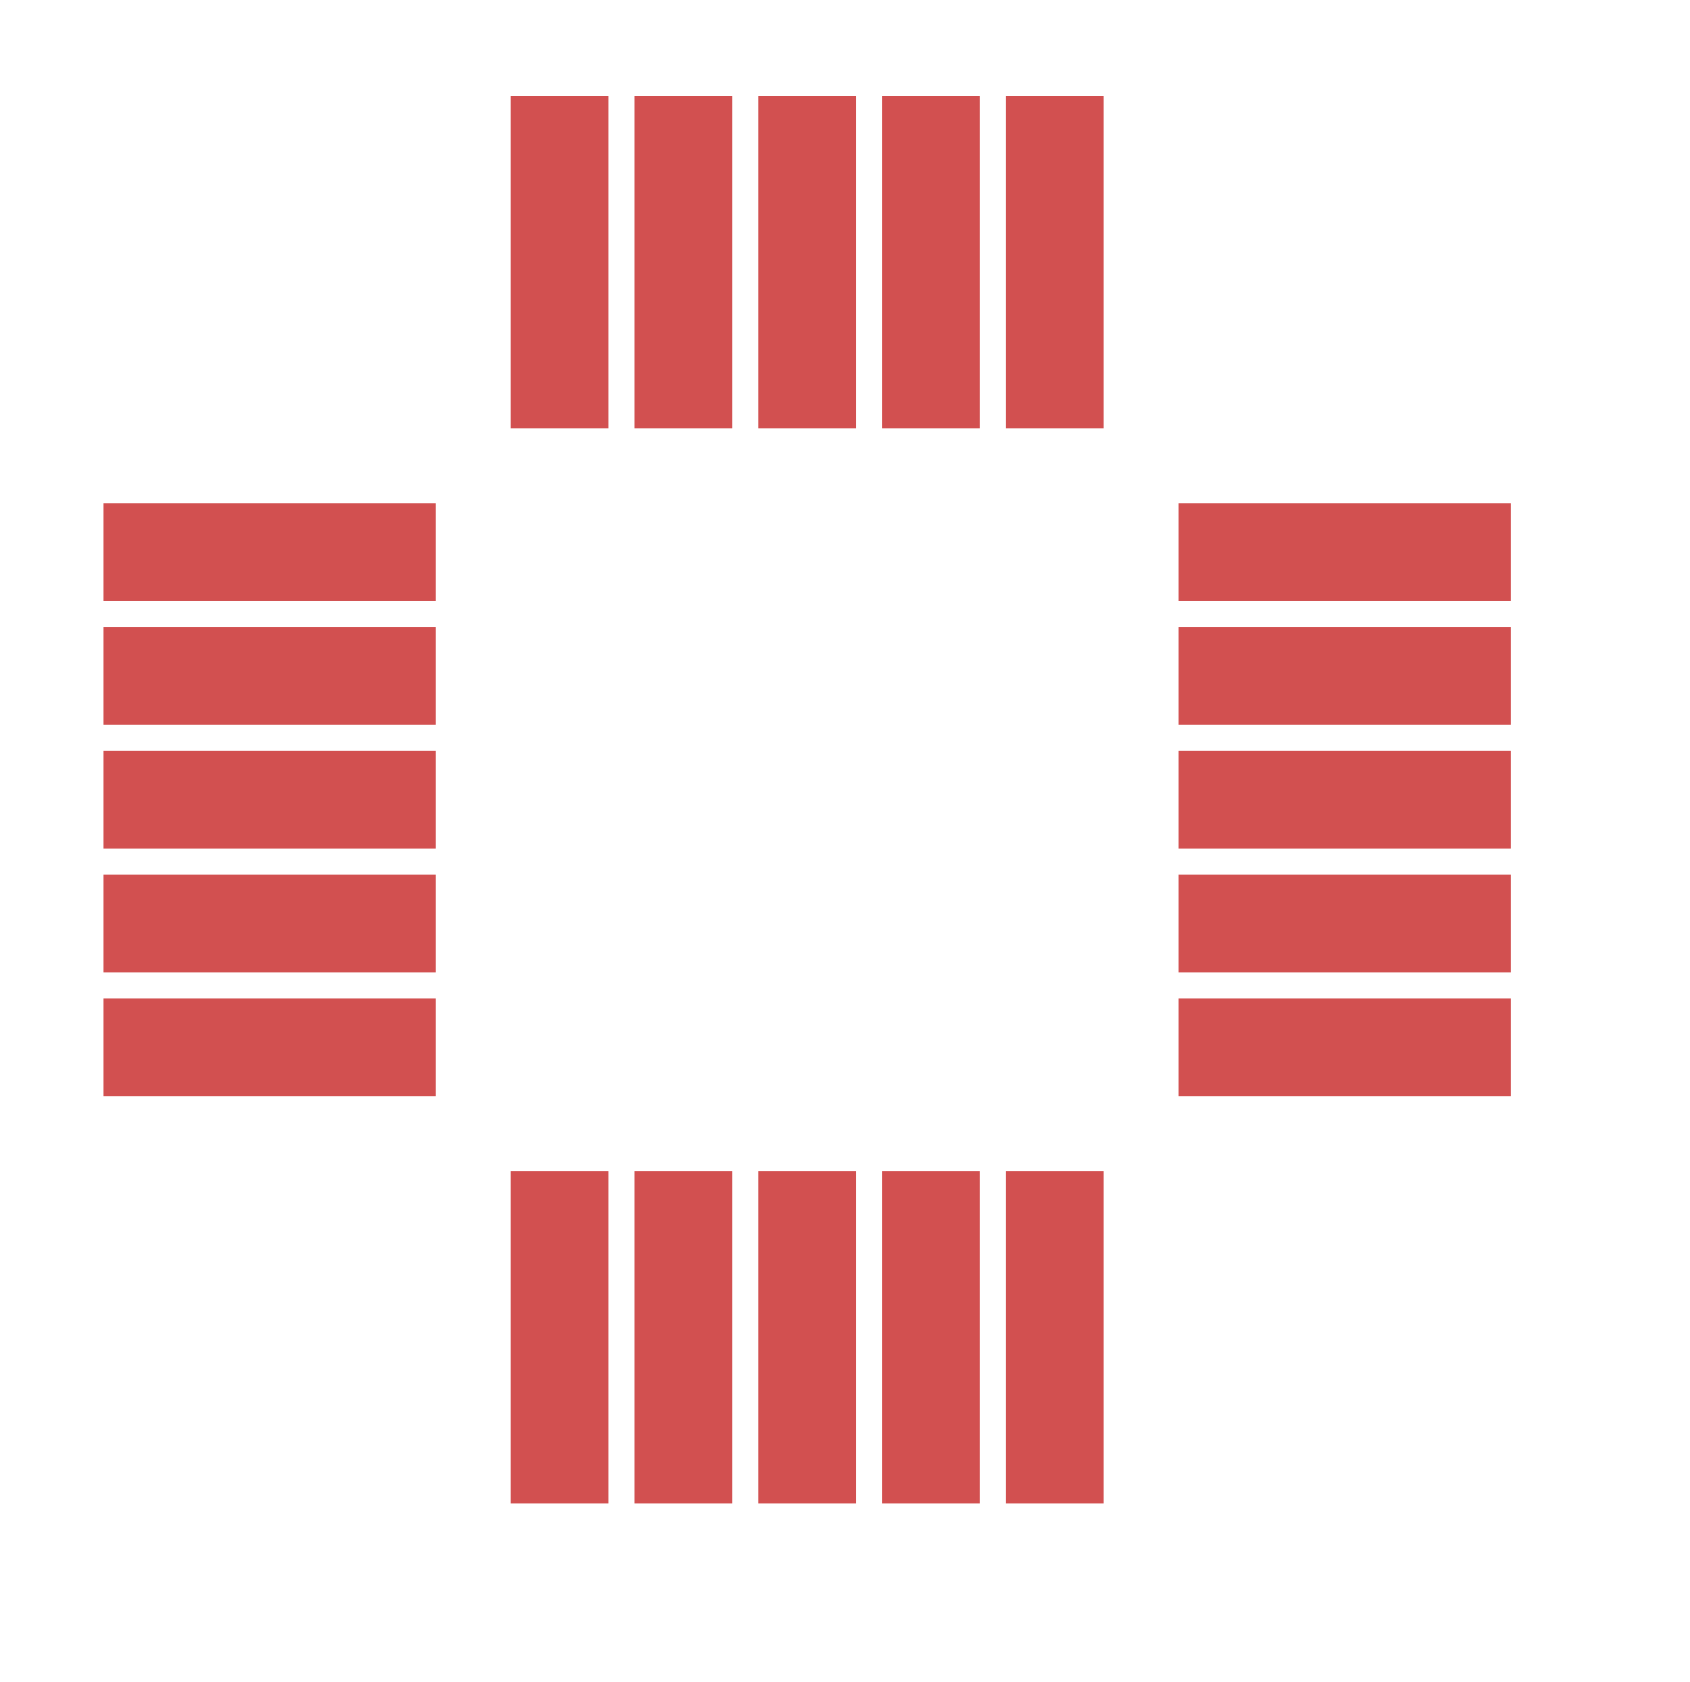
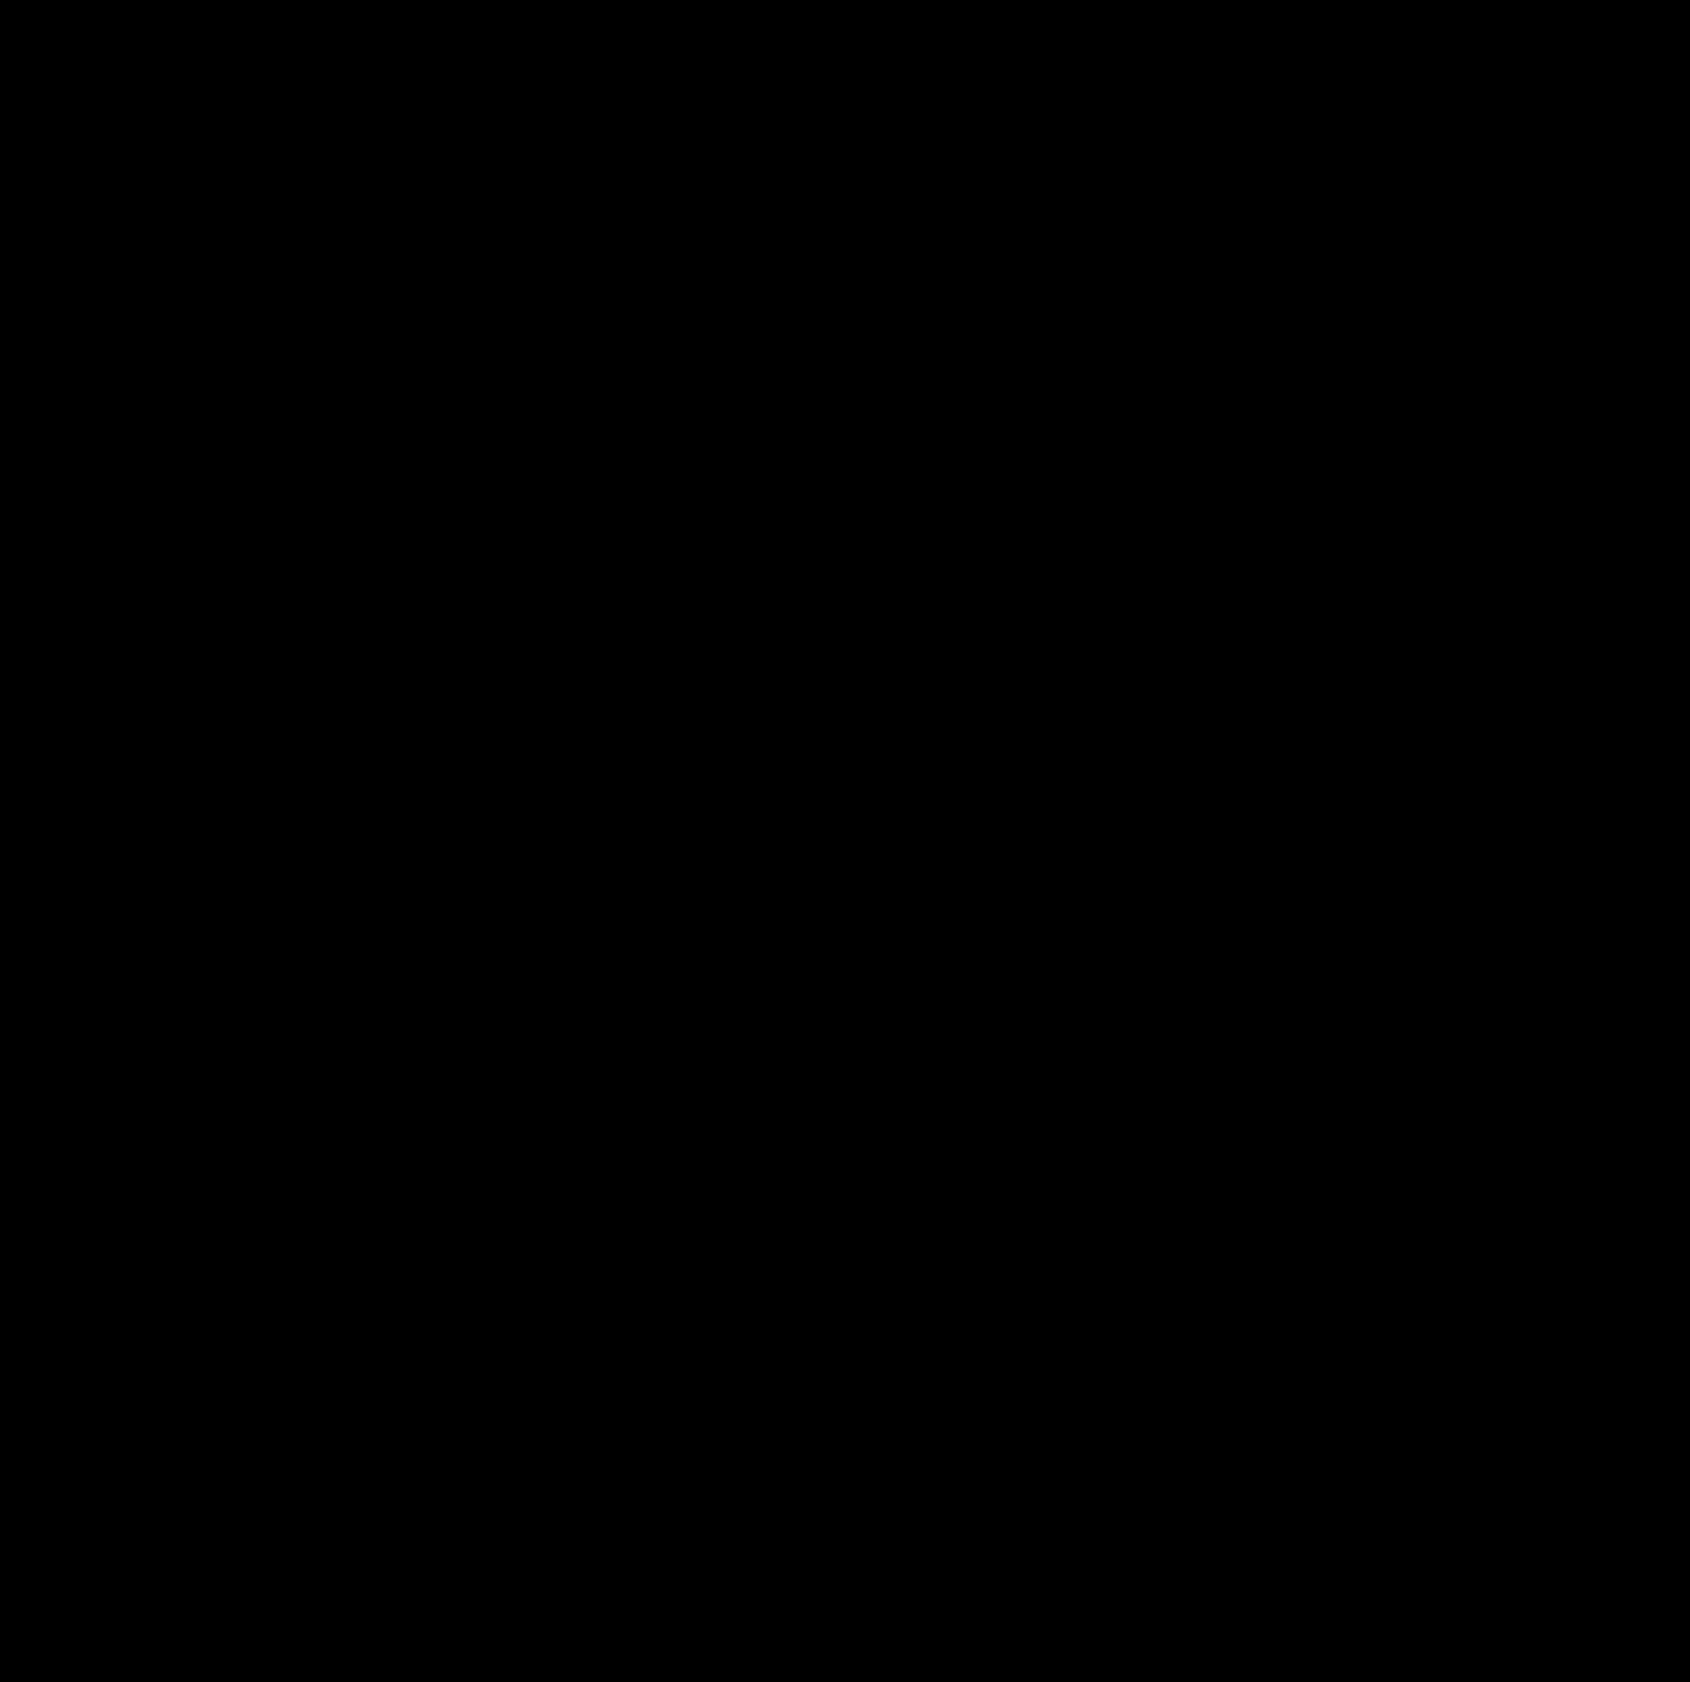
part: (807, 799) -> none

